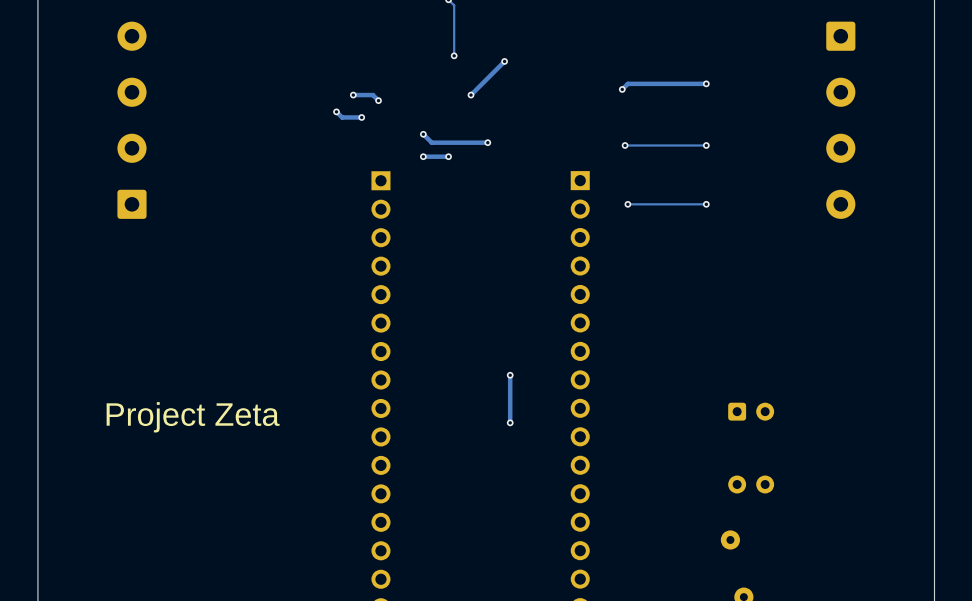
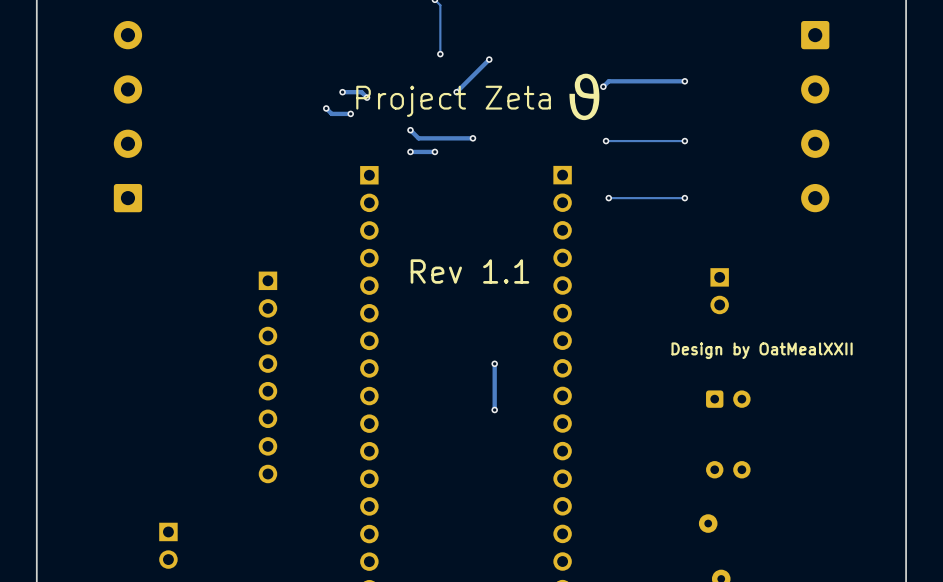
text: none -> ϑ (584, 96)
text: none -> Project Zeta (453, 101)
text: none -> Rev 1.1 (469, 271)
part: none -> (719, 291)
text: none -> Design by OatMealXXII (762, 350)
part: none -> (267, 377)
text: Project Zeta (193, 417) -> none
part: none -> (168, 545)

